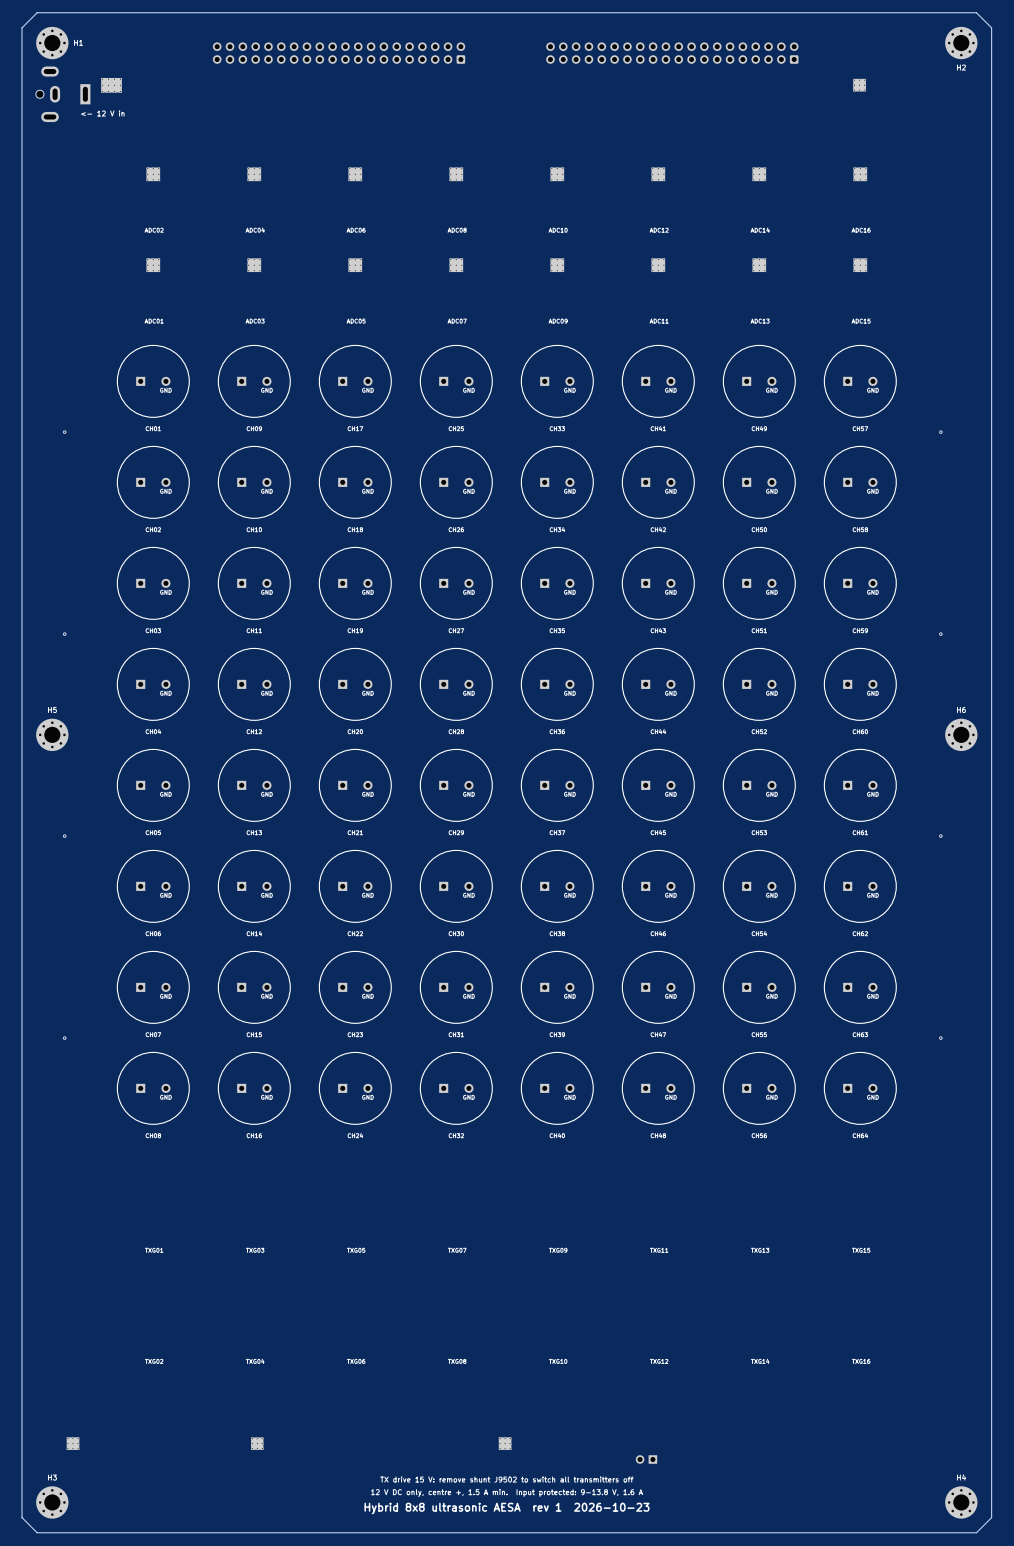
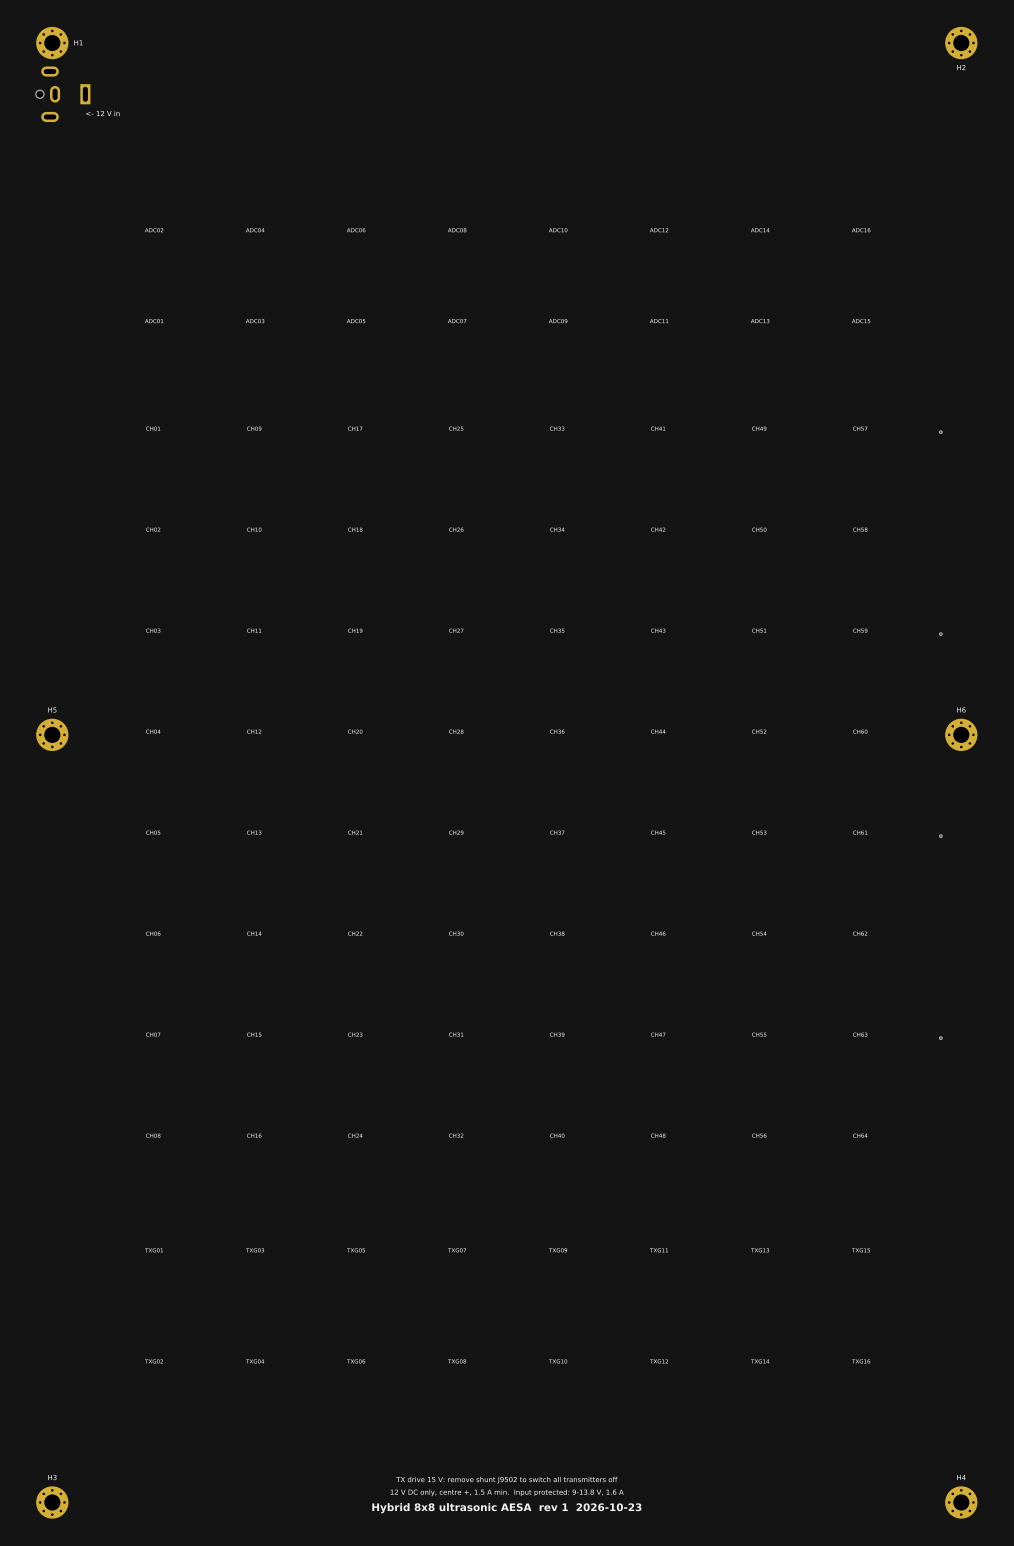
board edge: (37, 12) (22, 27) (22, 1517) (37, 1532) (976, 1532) (991, 1517) (991, 27) (976, 12) (37, 12) -> none
part: (339, 53) -> none
part: (672, 53) -> none
part: (111, 85) -> none
part: (859, 85) -> none
part: (153, 174) -> none
part: (254, 174) -> none
part: (355, 174) -> none
part: (456, 174) -> none
part: (557, 174) -> none
part: (658, 174) -> none
part: (759, 174) -> none
part: (860, 174) -> none
part: (153, 265) -> none
part: (254, 265) -> none
part: (355, 265) -> none
part: (456, 265) -> none
part: (557, 265) -> none
part: (658, 265) -> none
part: (759, 265) -> none
part: (860, 265) -> none
part: (153, 381) -> none
part: (254, 381) -> none
part: (355, 381) -> none
part: (456, 381) -> none
part: (557, 381) -> none
part: (658, 381) -> none
part: (759, 381) -> none
part: (860, 381) -> none
part: (64, 432) -> none
part: (153, 482) -> none
part: (254, 482) -> none
part: (355, 482) -> none
part: (456, 482) -> none
part: (557, 482) -> none
part: (658, 482) -> none
part: (759, 482) -> none
part: (860, 482) -> none
part: (153, 583) -> none
part: (254, 583) -> none
part: (355, 583) -> none
part: (456, 583) -> none
part: (557, 583) -> none
part: (658, 583) -> none
part: (759, 583) -> none
part: (860, 583) -> none
part: (64, 634) -> none
part: (153, 684) -> none
part: (254, 684) -> none
part: (355, 684) -> none
part: (456, 684) -> none
part: (557, 684) -> none
part: (658, 684) -> none
part: (759, 684) -> none
part: (860, 684) -> none
part: (153, 785) -> none
part: (254, 785) -> none
part: (355, 785) -> none
part: (456, 785) -> none
part: (557, 785) -> none
part: (658, 785) -> none
part: (759, 785) -> none
part: (860, 785) -> none
part: (64, 836) -> none
part: (153, 886) -> none
part: (254, 886) -> none
part: (355, 886) -> none
part: (456, 886) -> none
part: (557, 886) -> none
part: (658, 886) -> none
part: (759, 886) -> none
part: (860, 886) -> none
part: (153, 987) -> none
part: (254, 987) -> none
part: (355, 987) -> none
part: (456, 987) -> none
part: (557, 987) -> none
part: (658, 987) -> none
part: (759, 987) -> none
part: (860, 987) -> none
part: (64, 1038) -> none
part: (153, 1088) -> none
part: (254, 1088) -> none
part: (355, 1088) -> none
part: (456, 1088) -> none
part: (557, 1088) -> none
part: (658, 1088) -> none
part: (759, 1088) -> none
part: (860, 1088) -> none
part: (73, 1443) -> none
part: (257, 1443) -> none
part: (505, 1443) -> none
part: (646, 1459) -> none

